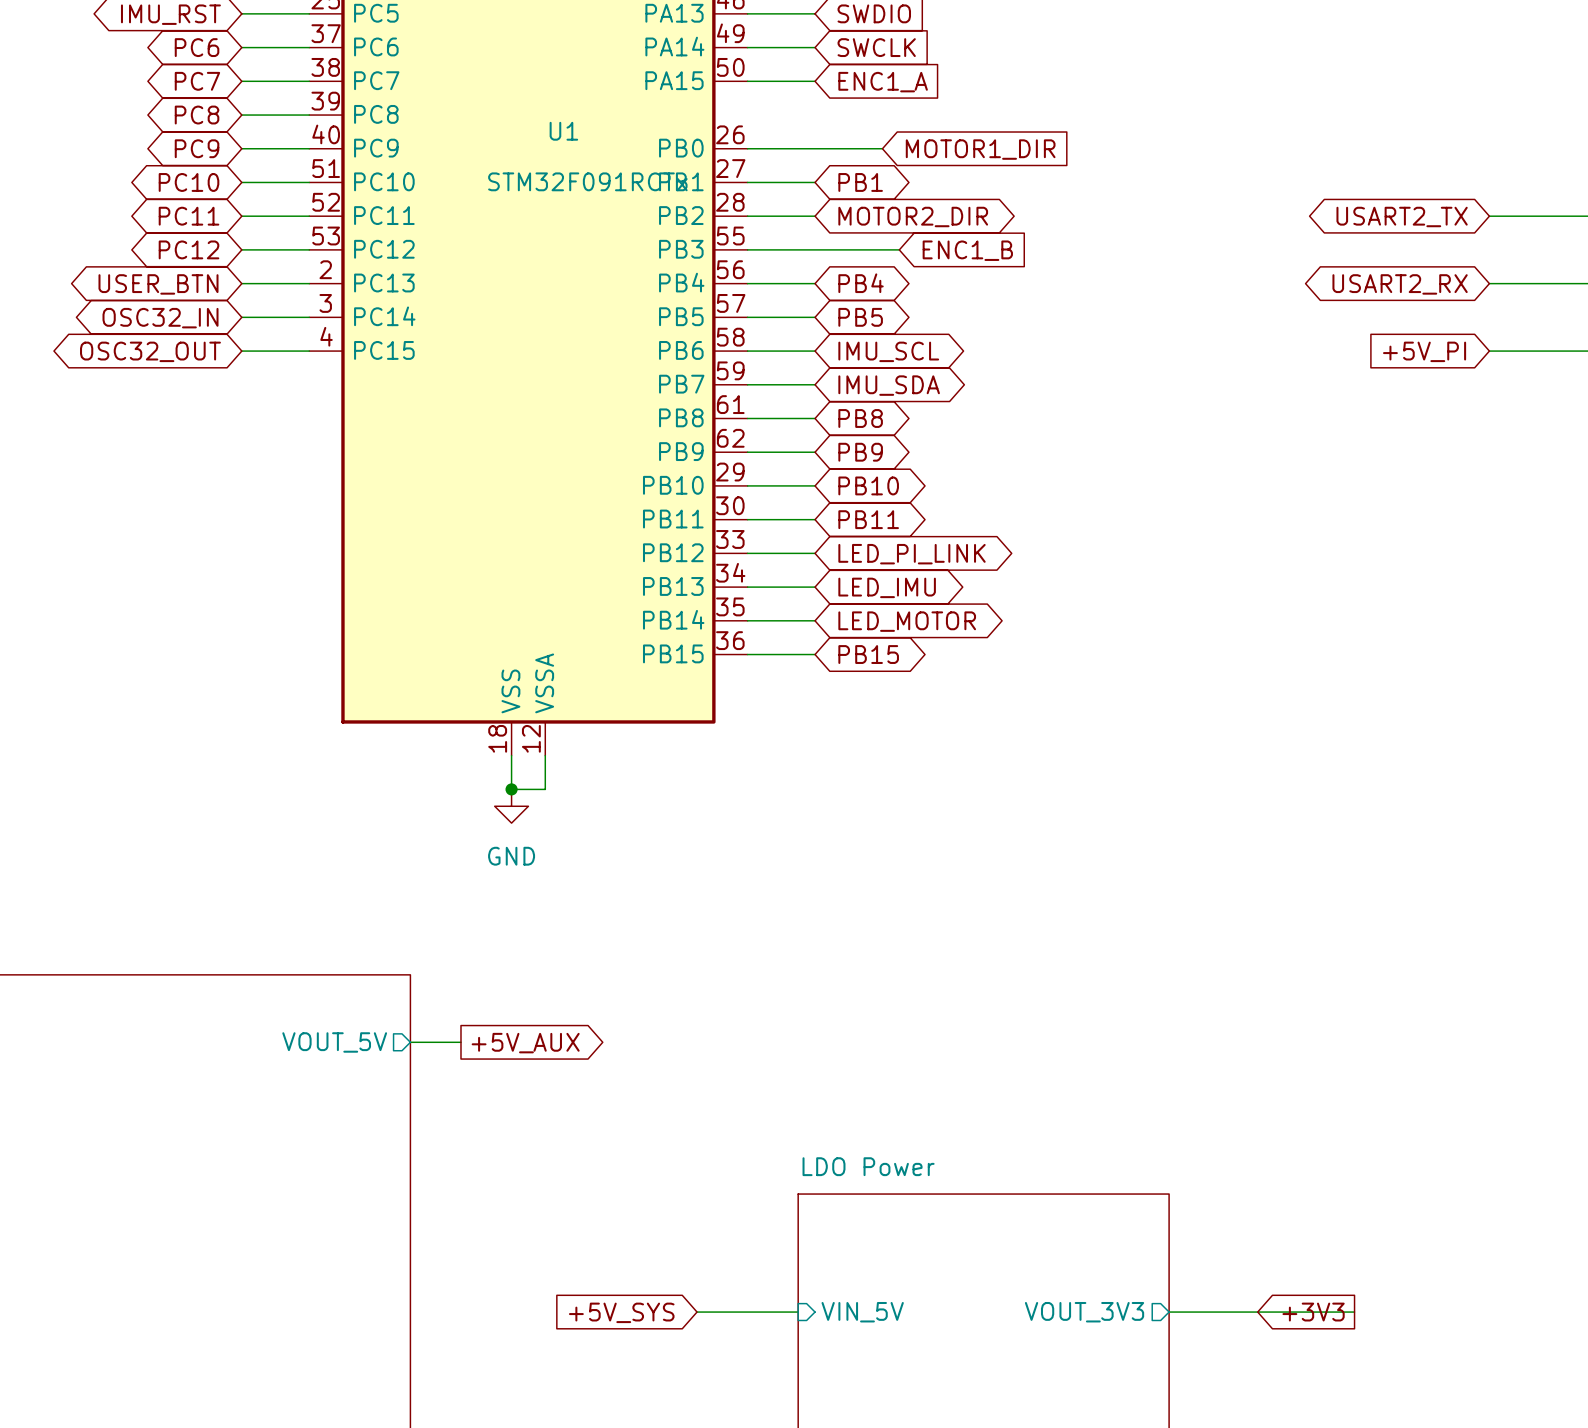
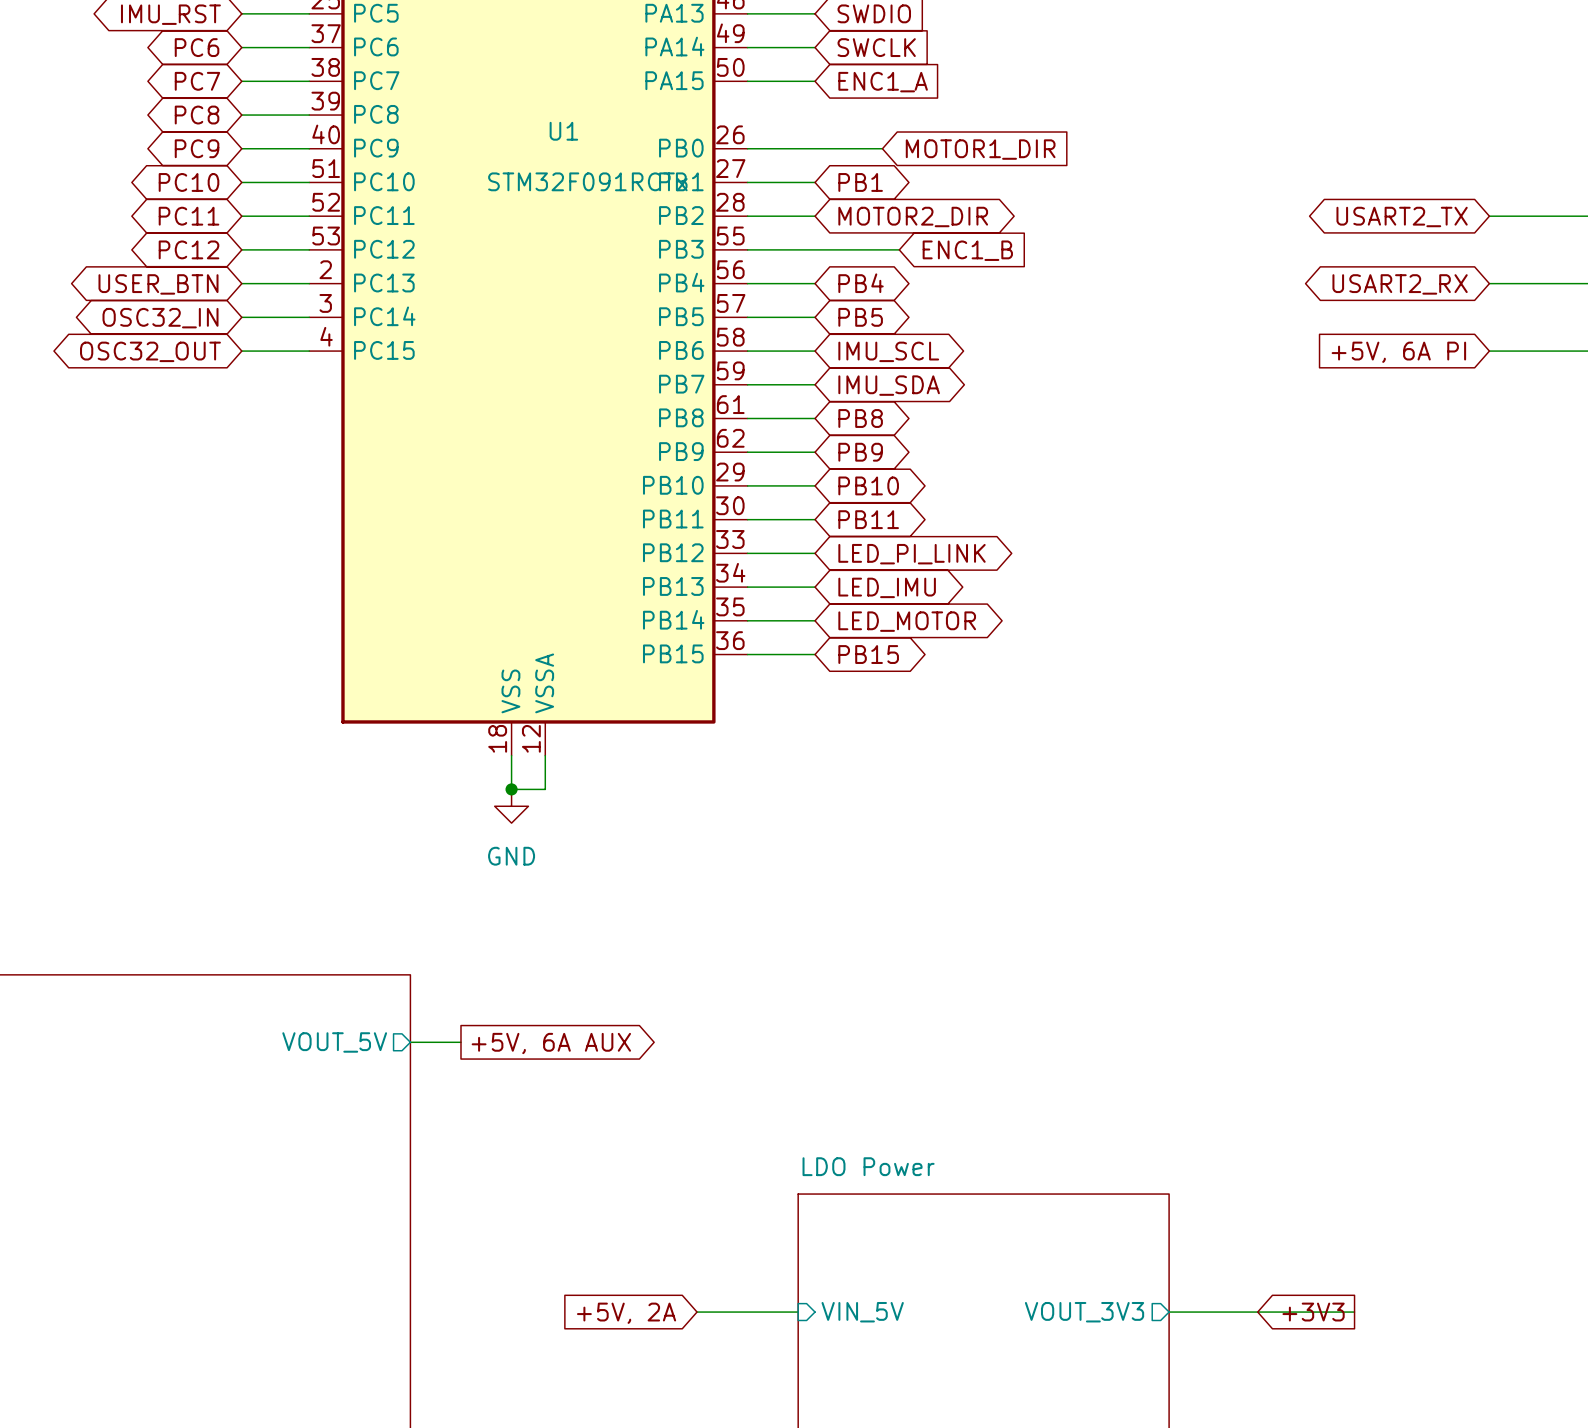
global label: +5V_PI (1424, 351) -> +5V, 6A PI (1398, 352)
global label: +5V_AUX (525, 1043) -> +5V, 6A AUX (551, 1043)
global label: +5V_SYS (621, 1312) -> +5V, 2A (626, 1313)

